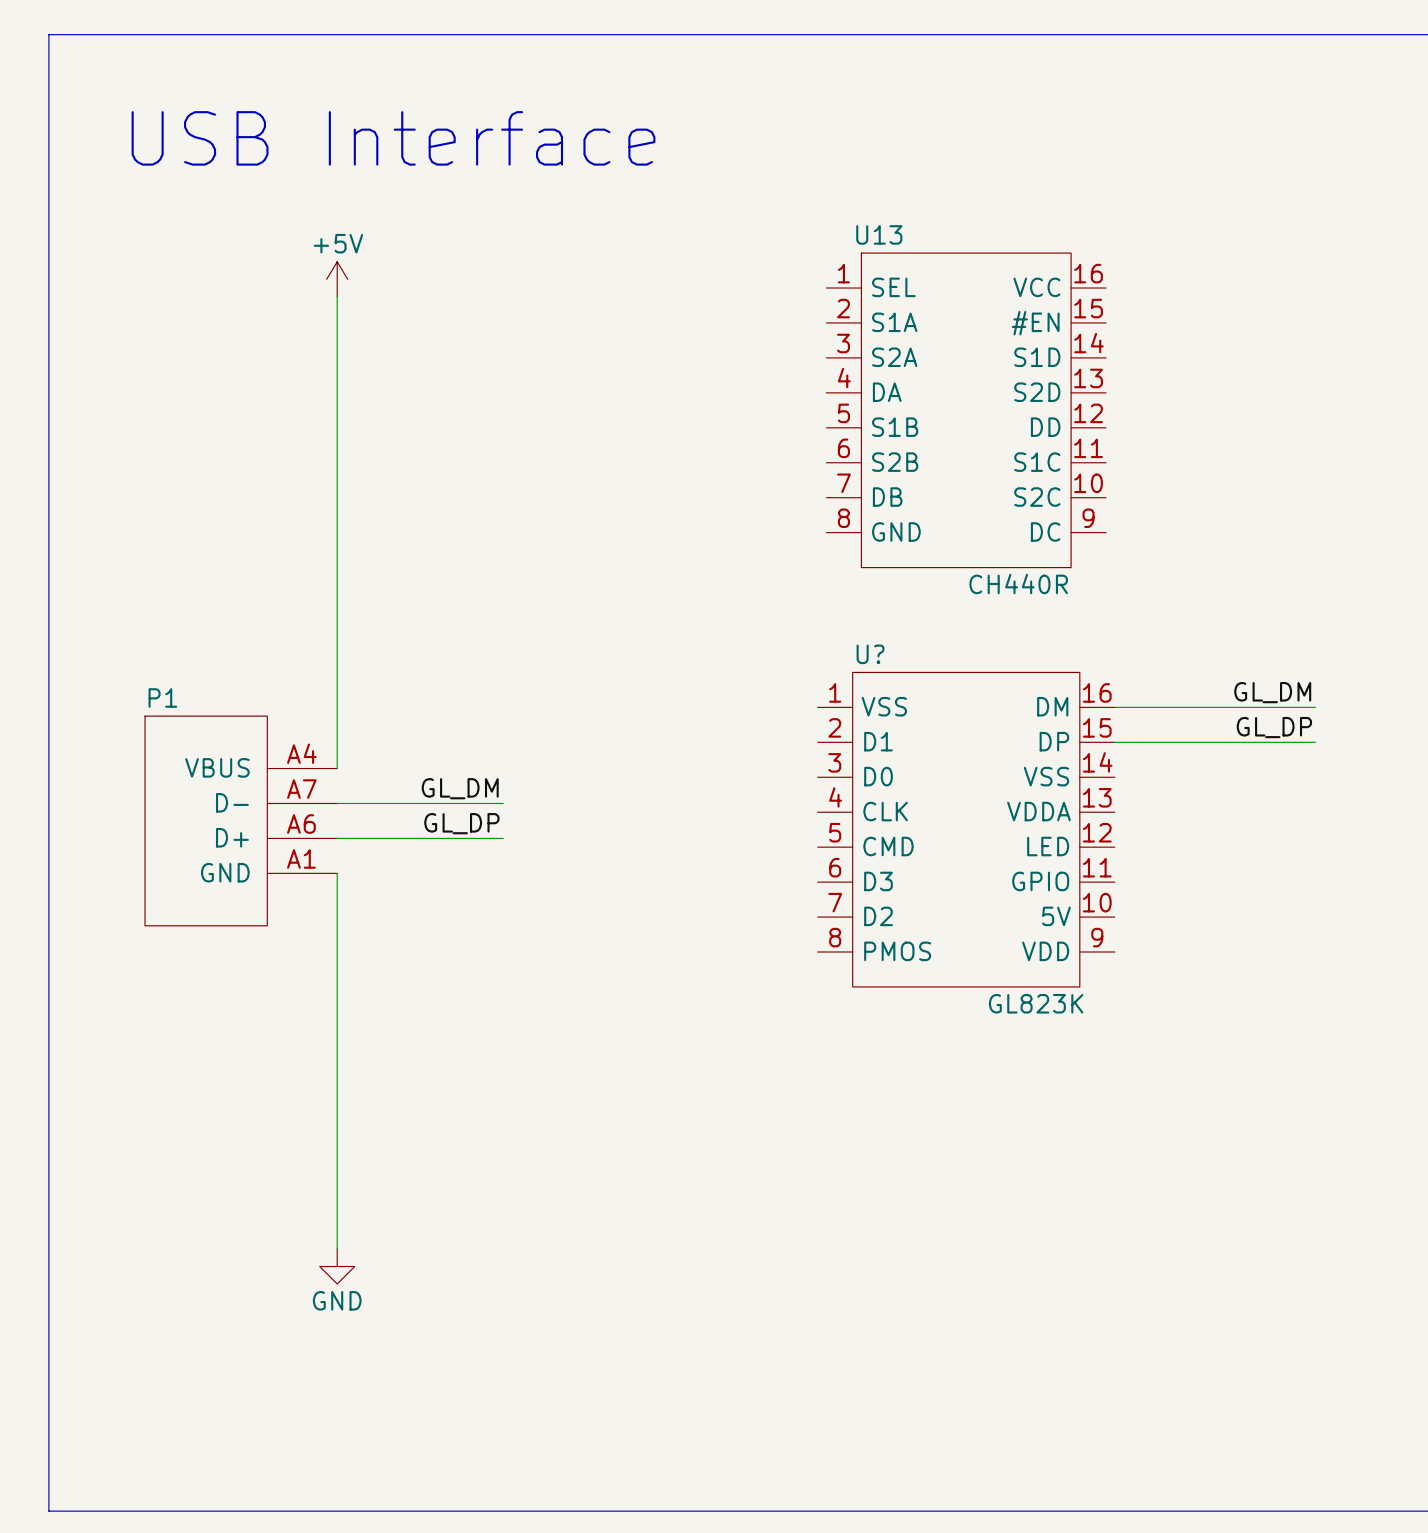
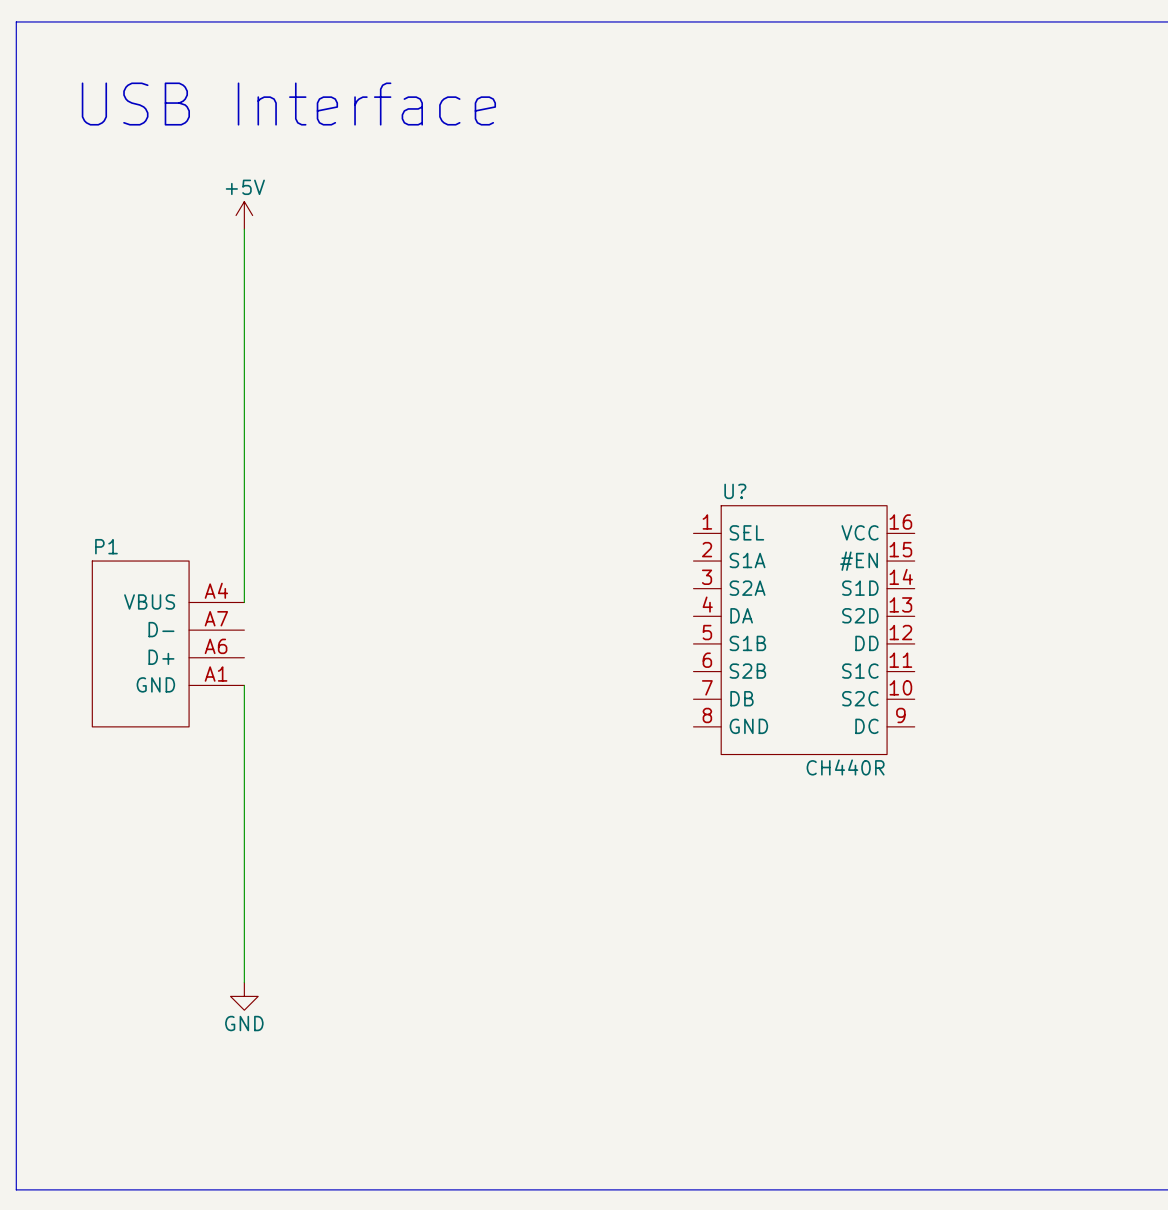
U13: CH440R (966, 410) -> none
label: GL_DM (1272, 692) -> none
wire: (1114, 707) (1315, 707) -> none
label: GL_DP (1274, 727) -> none
wire: (1114, 742) (1315, 742) -> none
label: GL_DM (460, 788) -> none
wire: (337, 803) (503, 803) -> none
U?: none -> CH440R (804, 630)
label: GL_DP (461, 823) -> none
U?: GL823K (966, 829) -> none
wire: (337, 838) (503, 838) -> none

